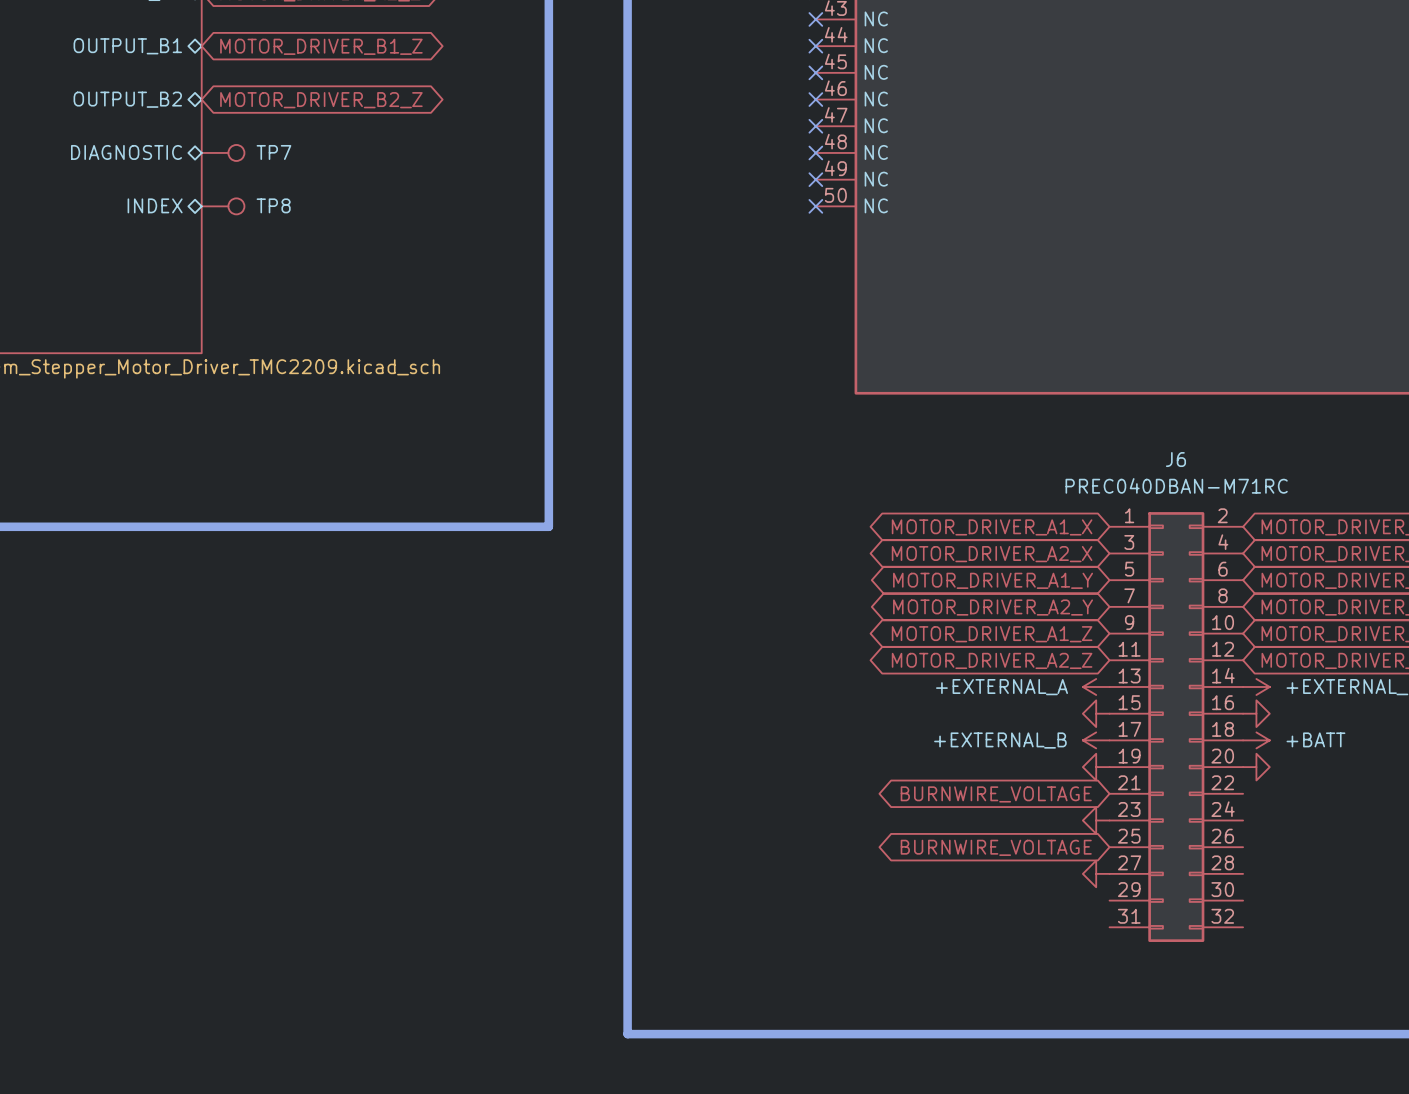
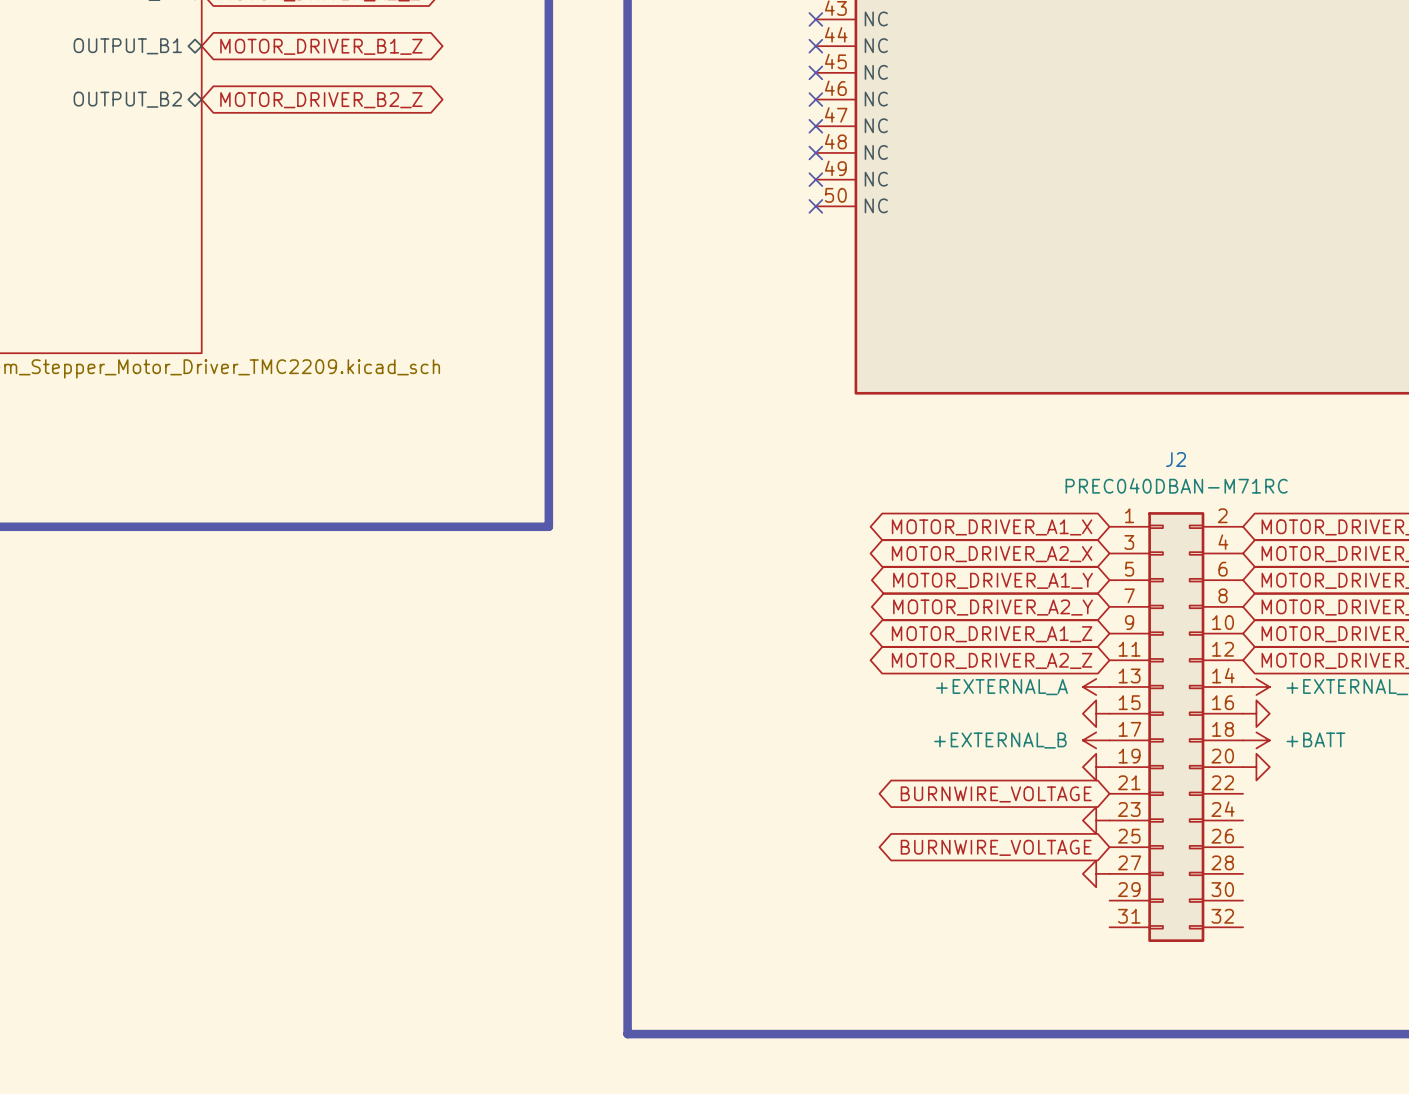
sheet pin: DIAGNOSTIC (126, 152) -> none
TP7: (223, 152) -> none
sheet pin: INDEX (155, 205) -> none
TP8: (223, 206) -> none
J6 name: J6 (1175, 459) -> J2 (1175, 459)

